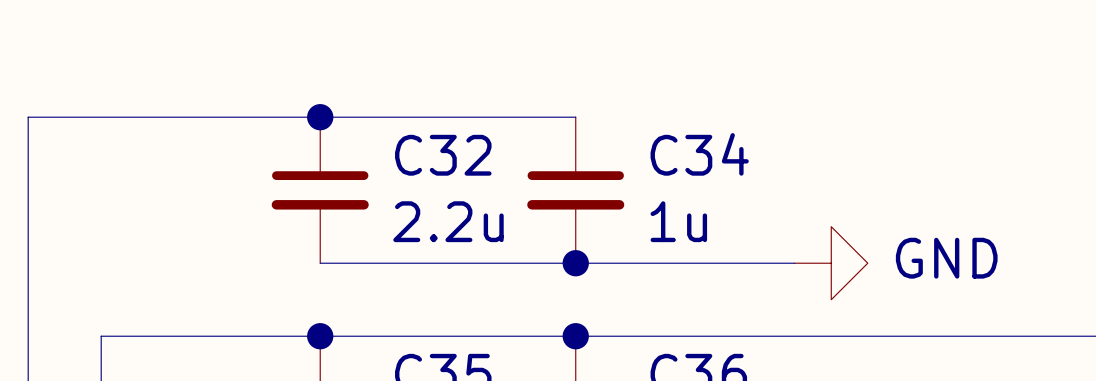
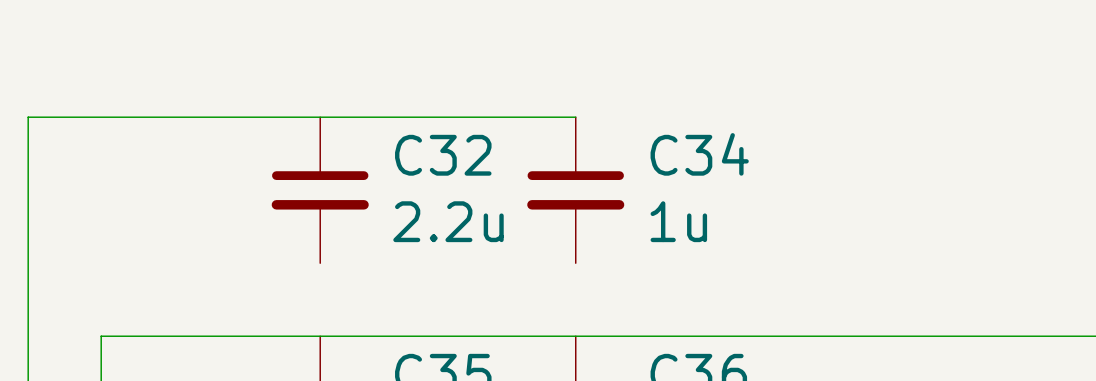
junction: (320, 117) -> none
wire: (320, 263) (794, 263) -> none
junction: (575, 263) -> none
power symbol: GND (831, 263) -> none
junction: (320, 336) -> none
junction: (575, 336) -> none

